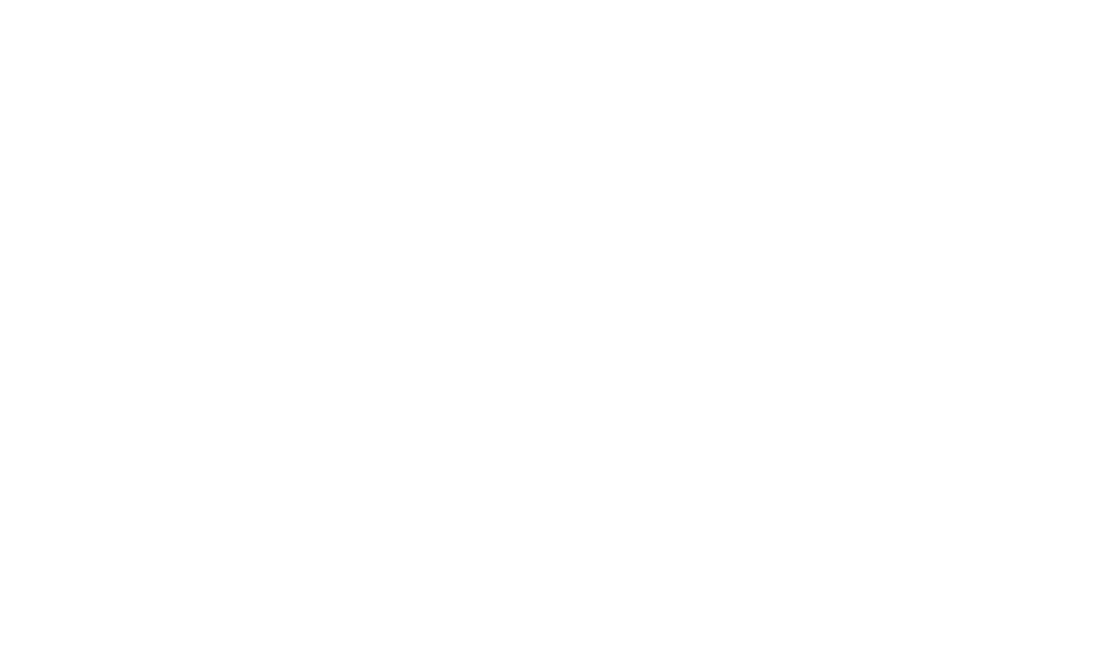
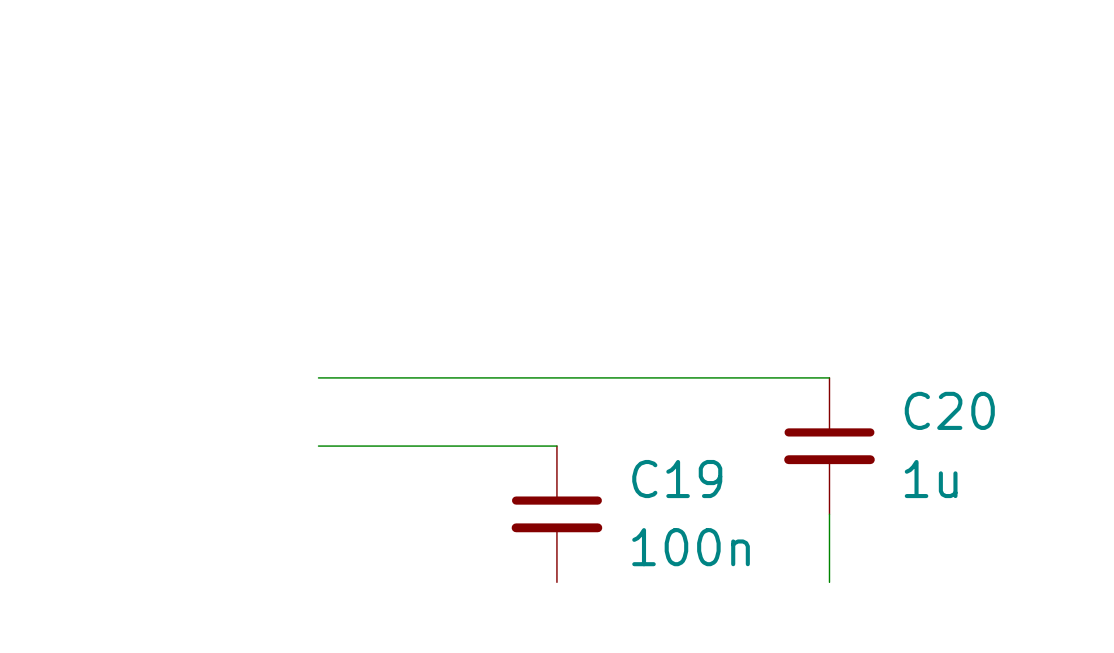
wire: none -> (318, 377) (829, 377)
wire: none -> (318, 446) (556, 446)
C20: none -> 1u (829, 446)
C19: none -> 100n (556, 514)
wire: none -> (829, 514) (829, 582)

